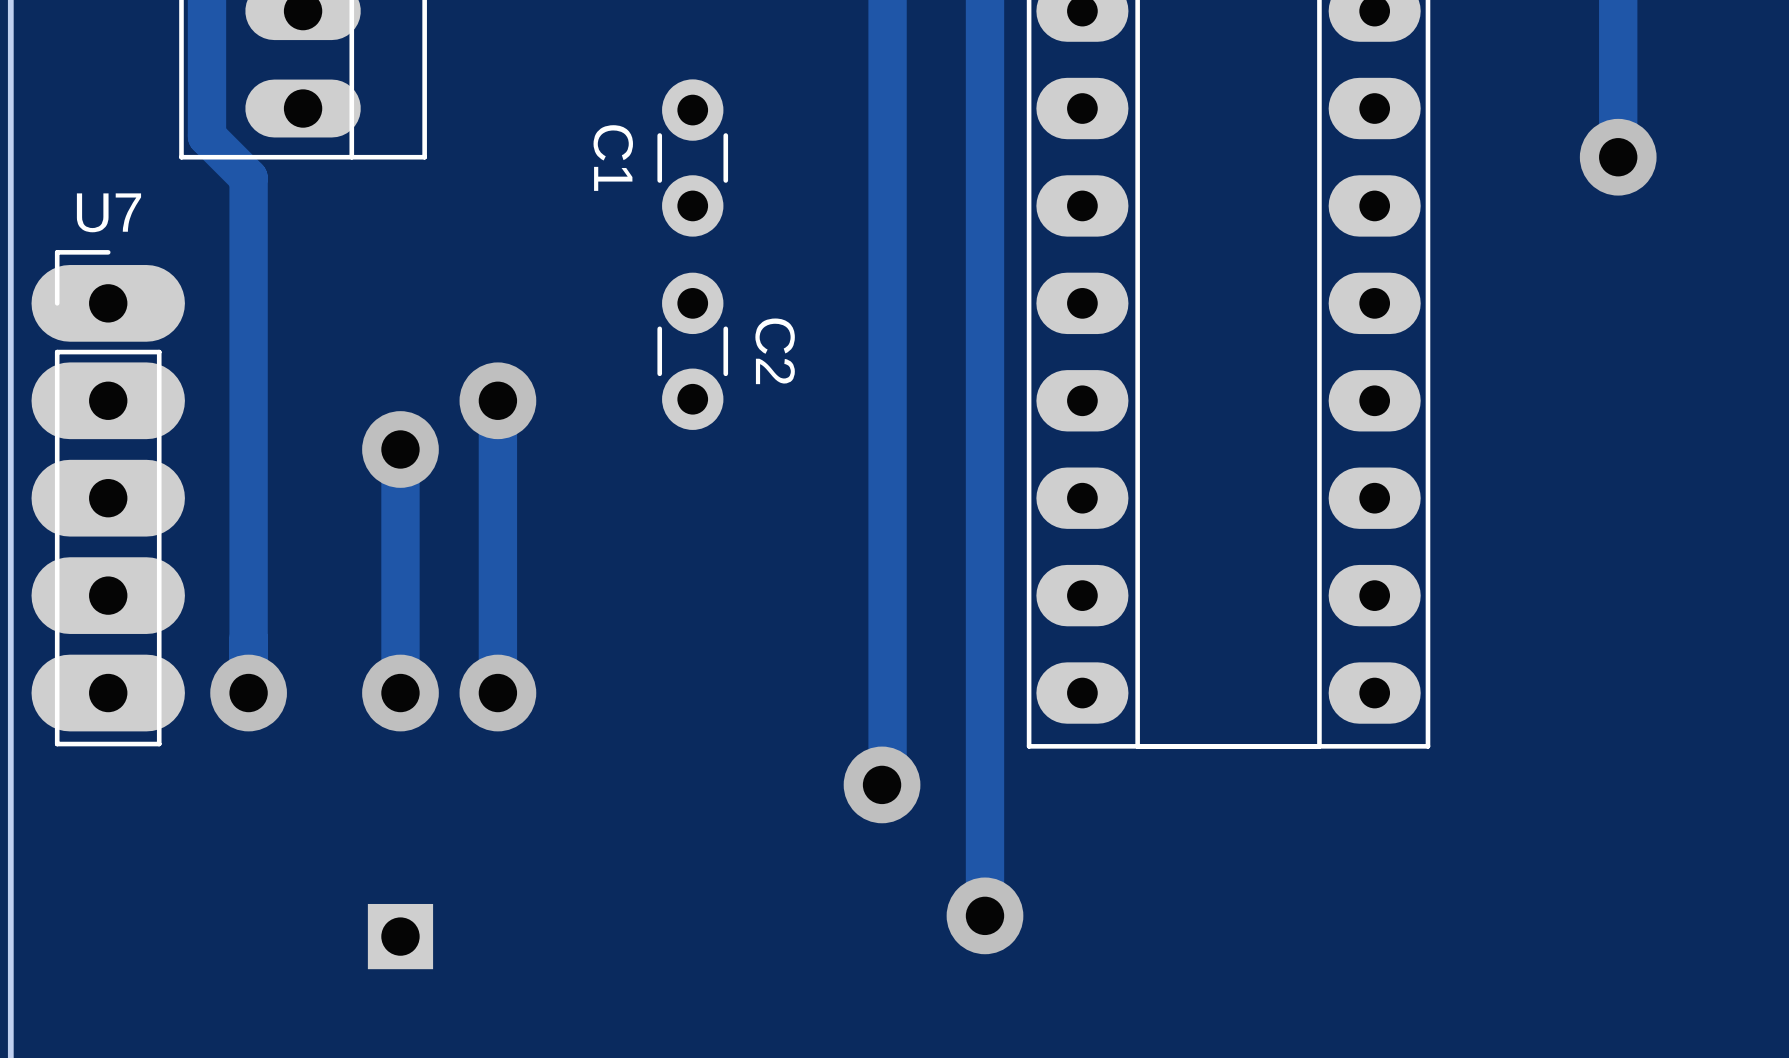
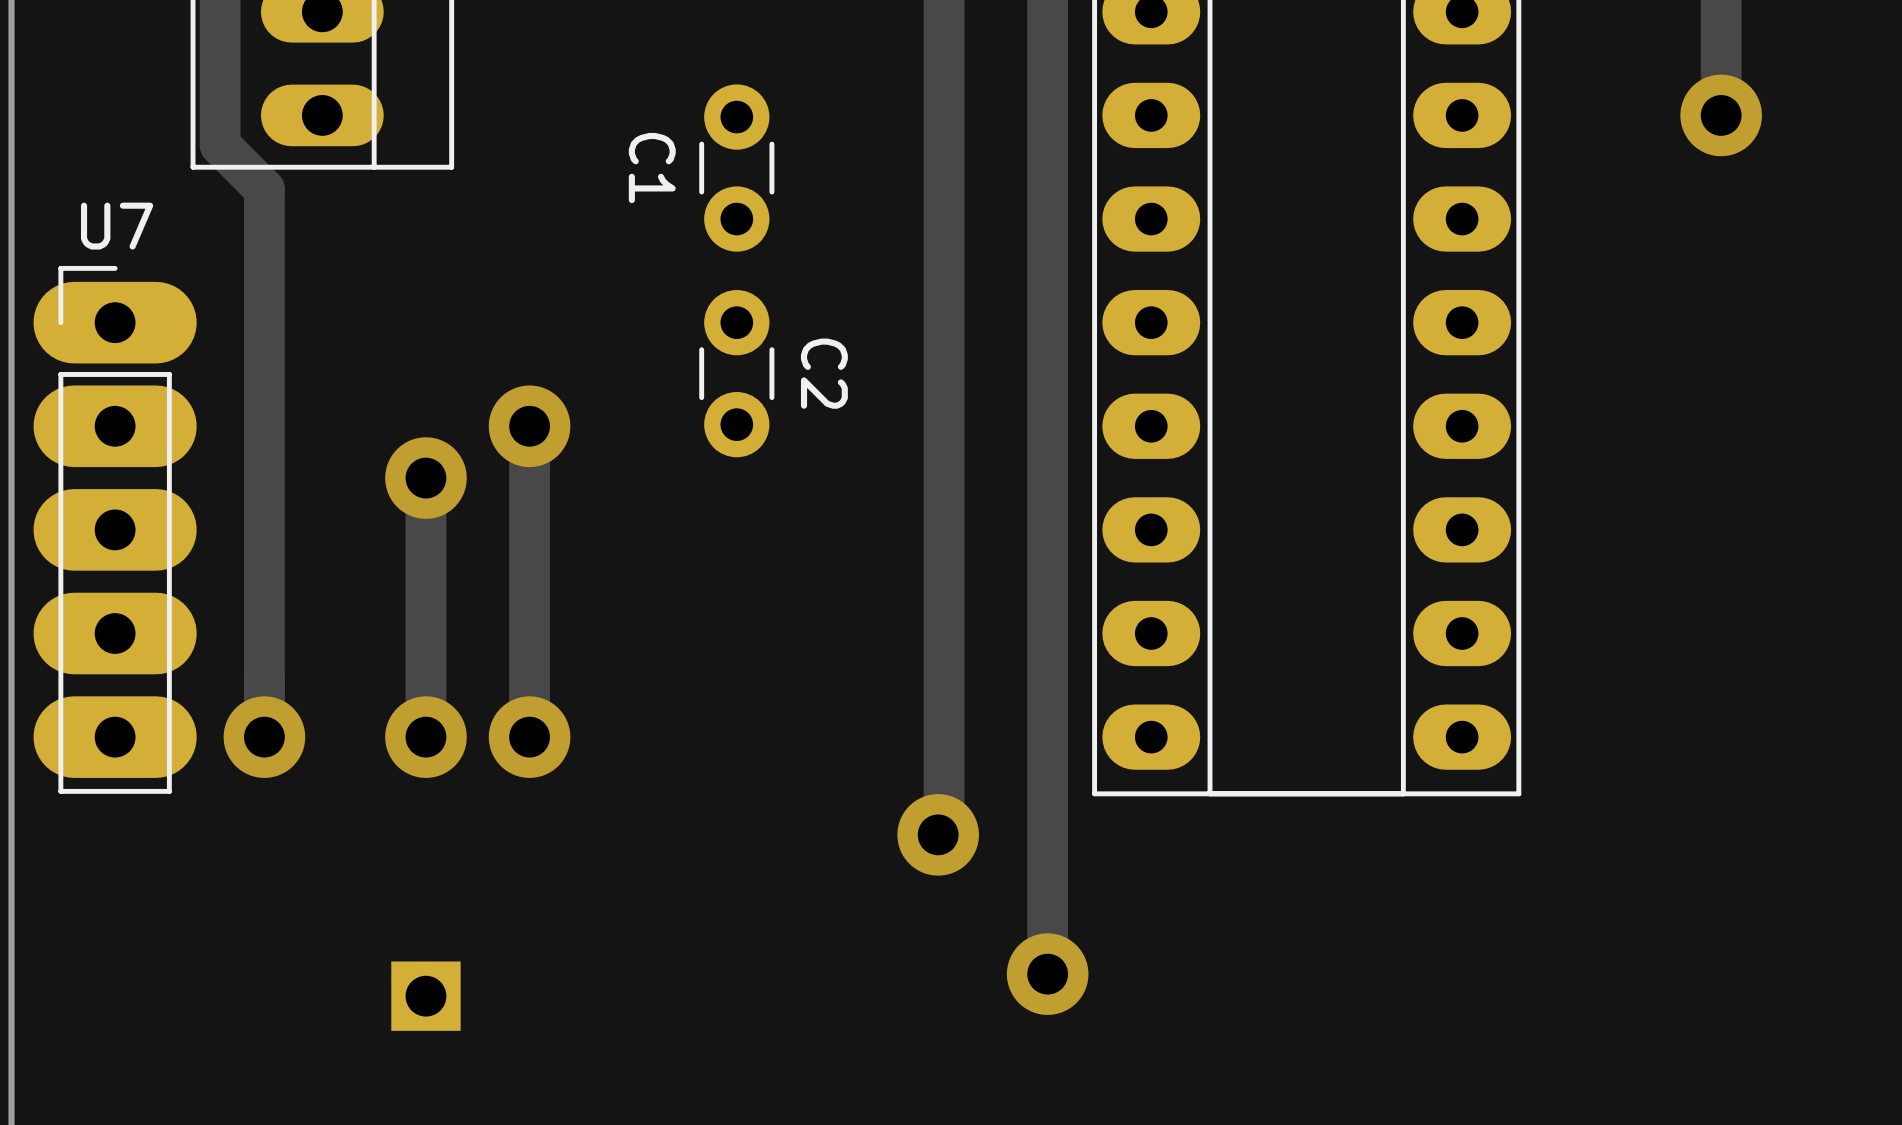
via position: (1618, 157) -> (1721, 115)

